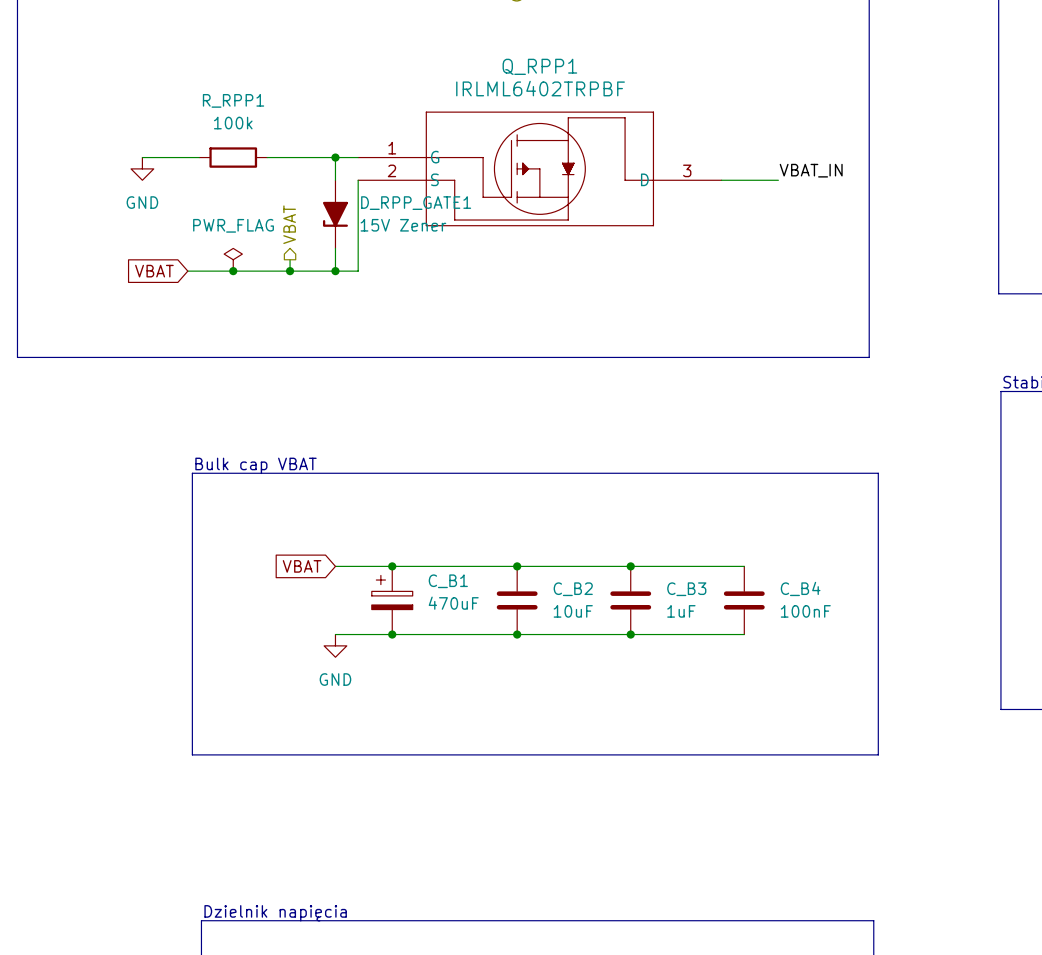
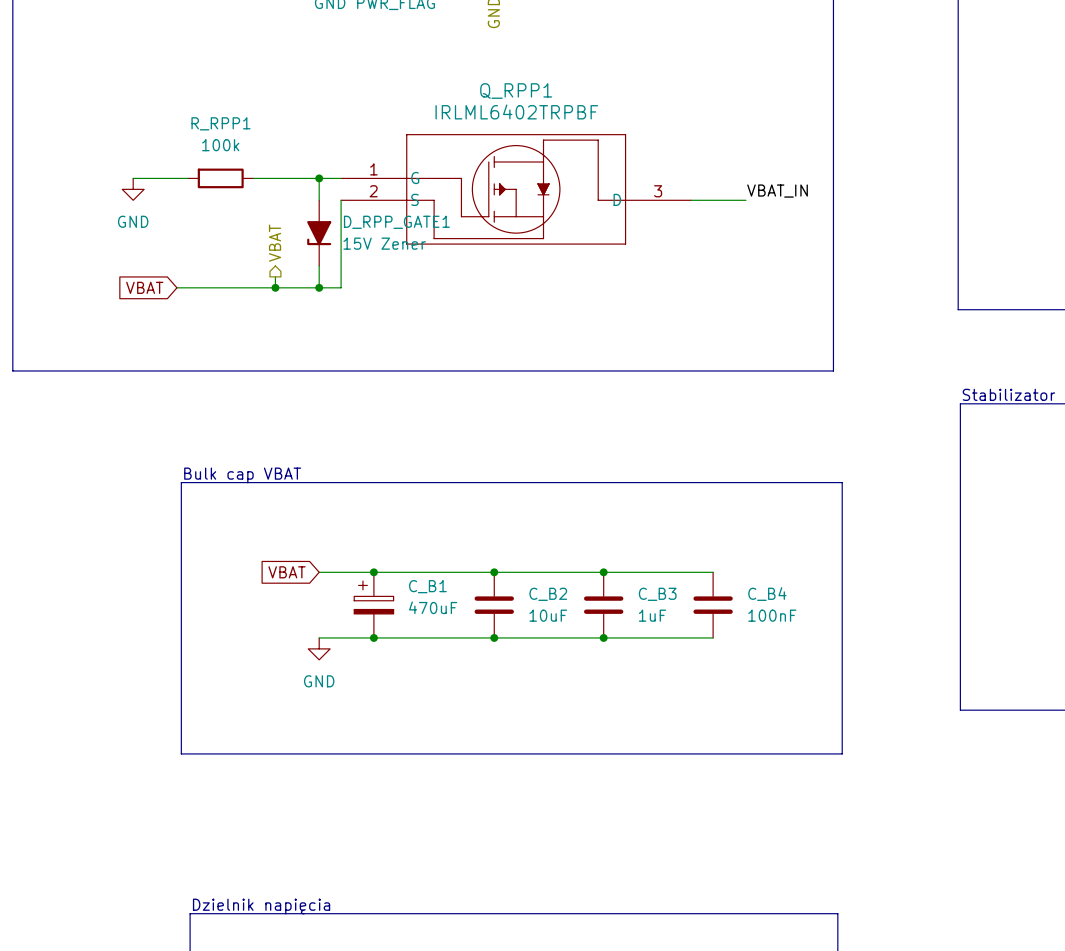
power symbol: PWR_FLAG (233, 259) -> none
junction: (233, 271) -> none

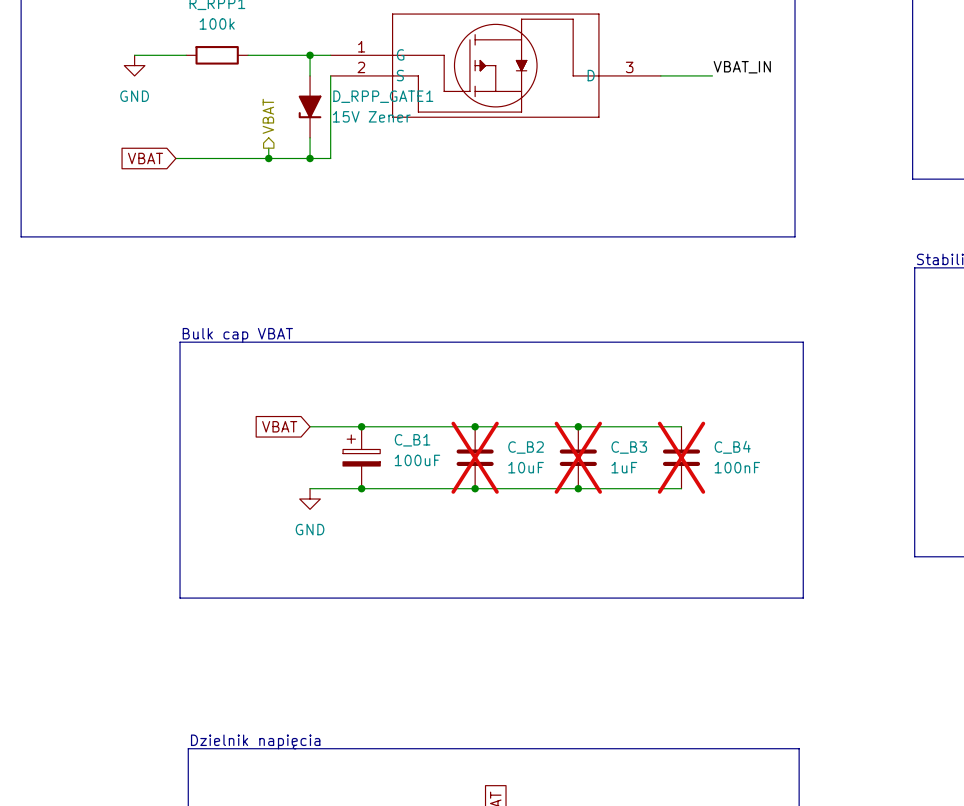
C_B2 do-not-place cross: none -> (475, 457)
C_B3 do-not-place cross: none -> (578, 457)
C_B4 do-not-place cross: none -> (681, 457)
C_B1 value: 470uF (433, 607) -> 100uF (417, 460)

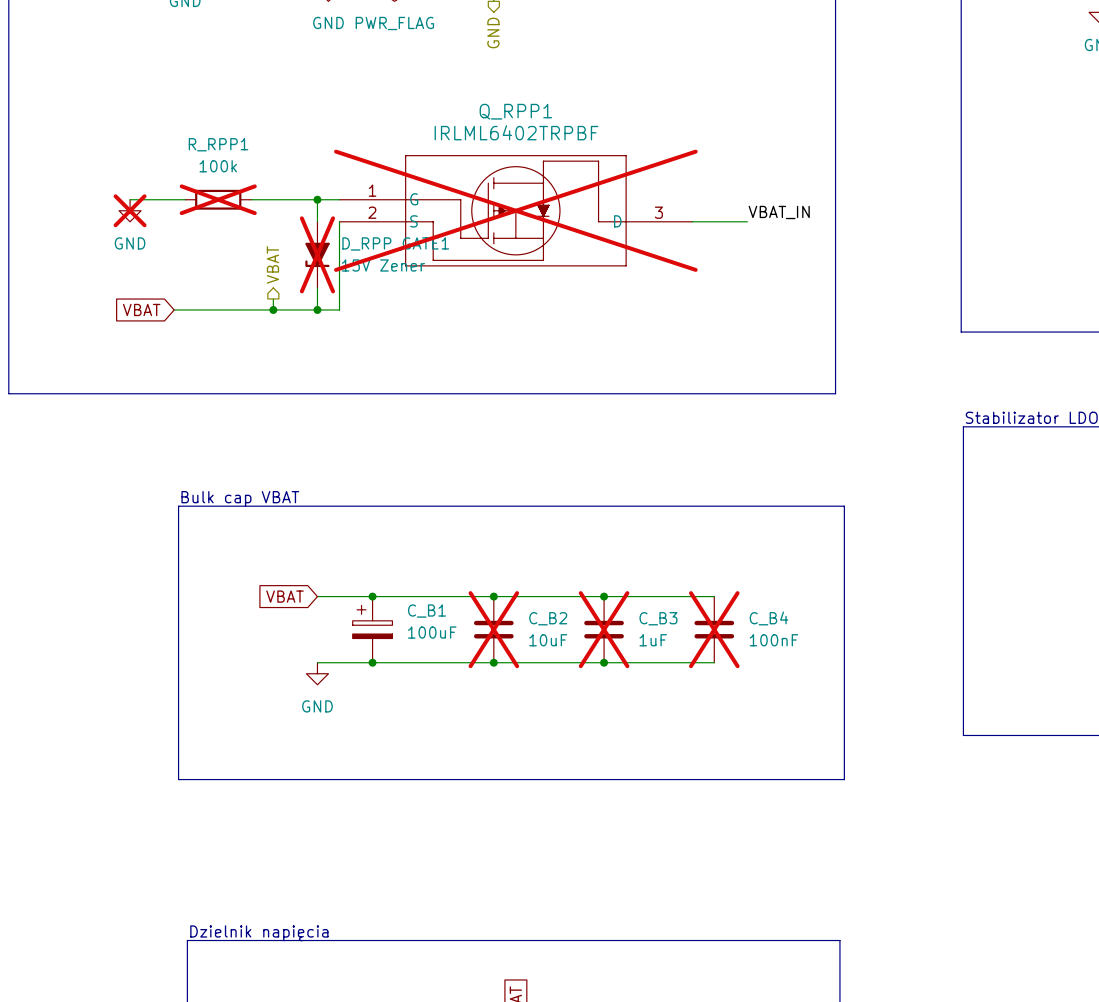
R_RPP1 do-not-place cross: none -> (218, 199)
power symbol do-not-place cross: none -> (130, 210)
Q_RPP1 do-not-place cross: none -> (515, 210)
D_RPP_GATE1 do-not-place cross: none -> (317, 254)

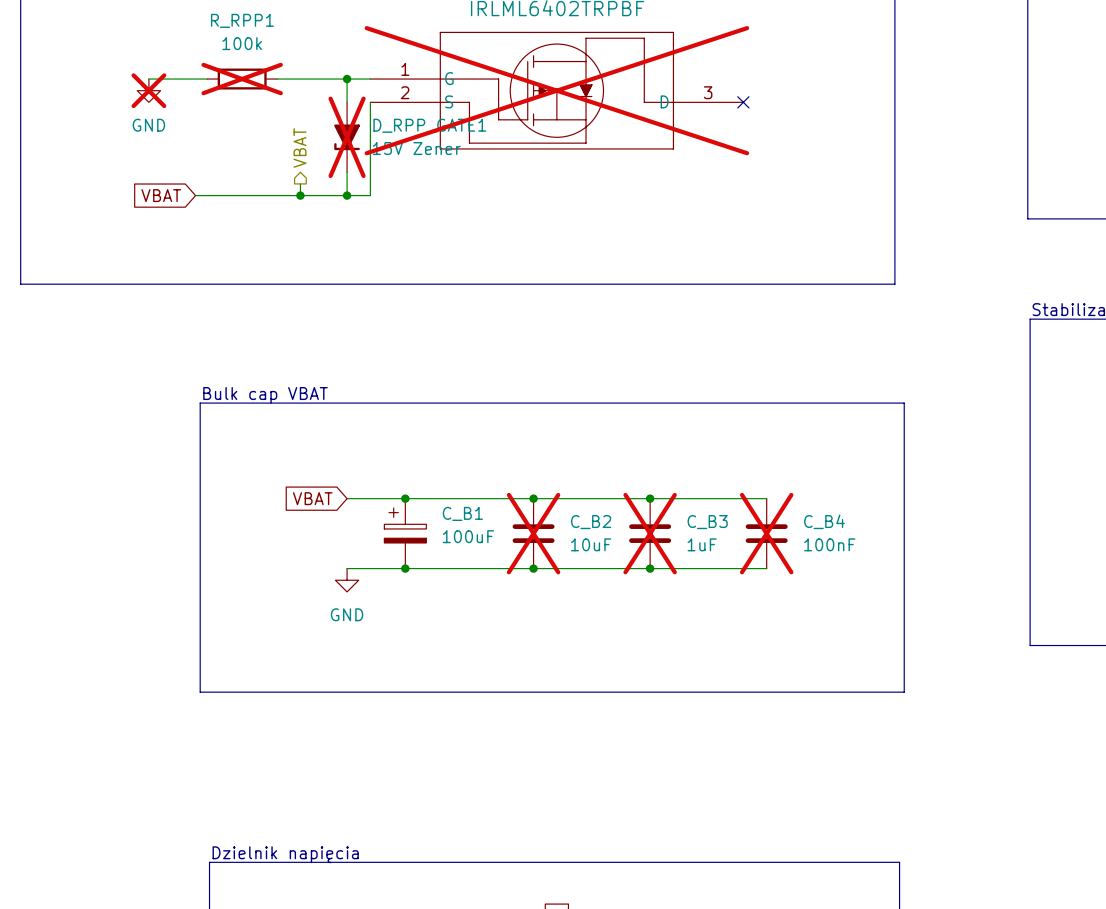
label: VBAT_IN (779, 212) -> none
wire: (692, 221) (747, 221) -> none
no-connect mark: none -> (743, 102)

